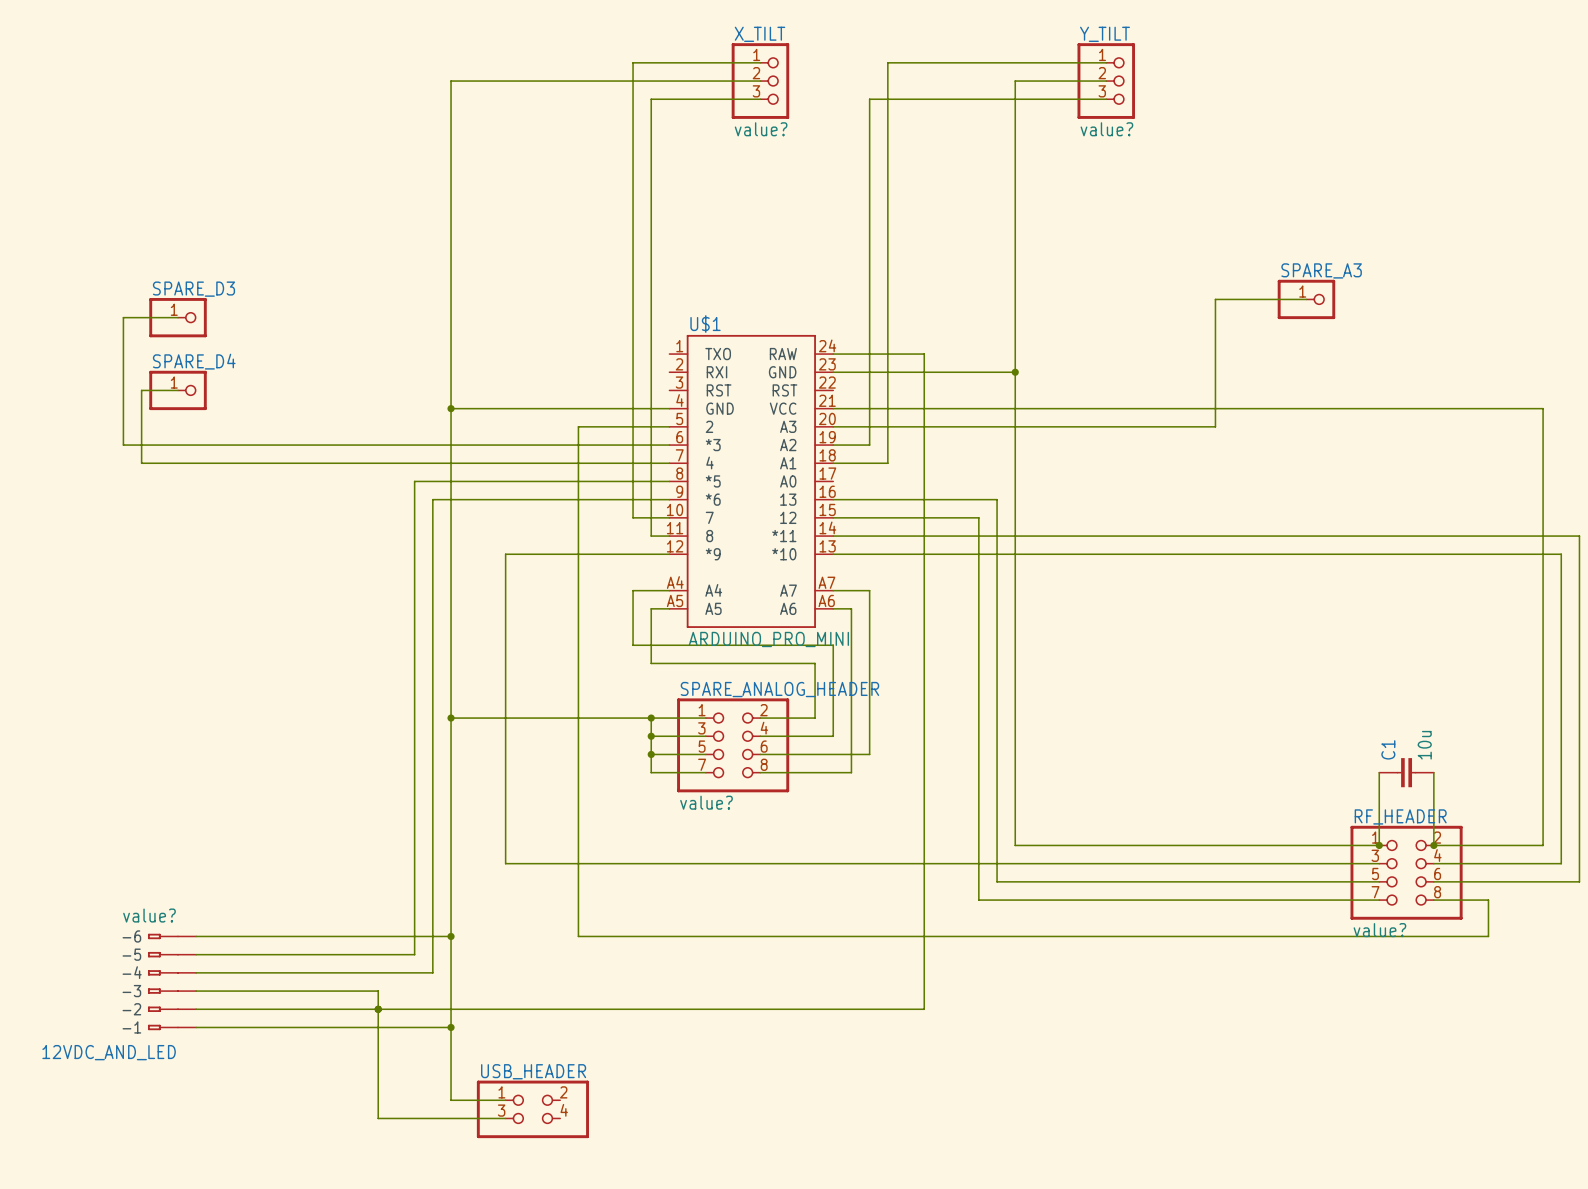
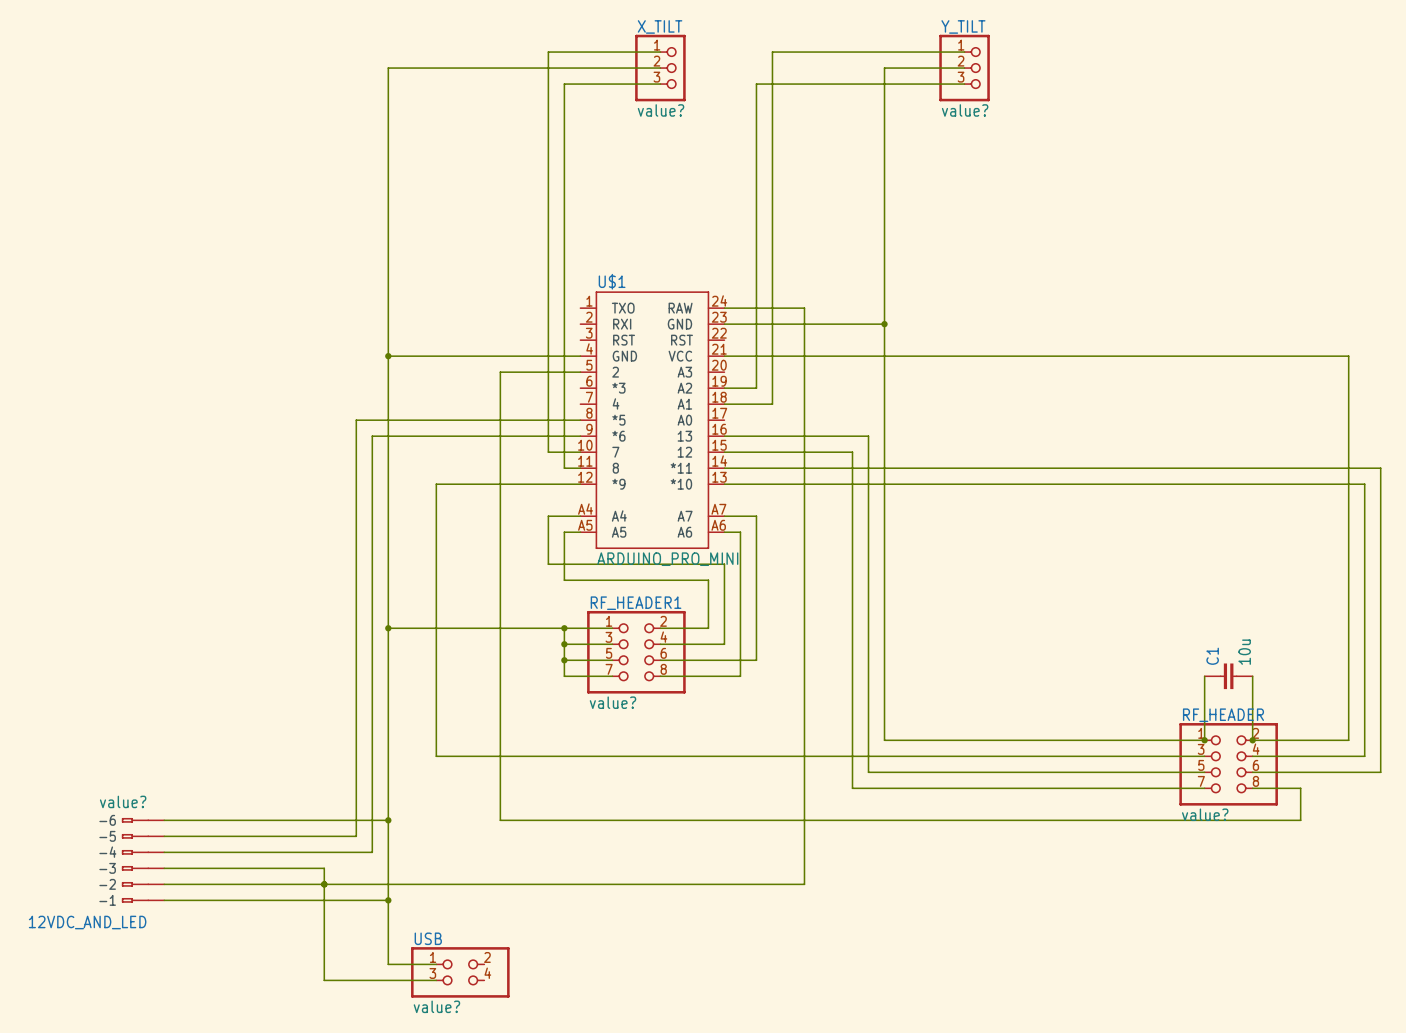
wire: (1306, 299) (1215, 299) (1215, 426) (833, 426) -> none
SPARE_A3: (1306, 299) -> none
wire: (178, 317) (123, 317) (123, 445) (669, 445) -> none
SPARE_D3: (178, 317) -> none
wire: (178, 390) (141, 390) (141, 463) (669, 463) -> none
SPARE_D4: (178, 390) -> none
SPARE_ANALOG_HEADER name: SPARE_ANALOG_HEADER (779, 689) -> RF_HEADER1 (636, 603)
USB_HEADER name: USB_HEADER (533, 1071) -> USB (428, 938)
USB_HEADER value: none -> value? (436, 1006)

